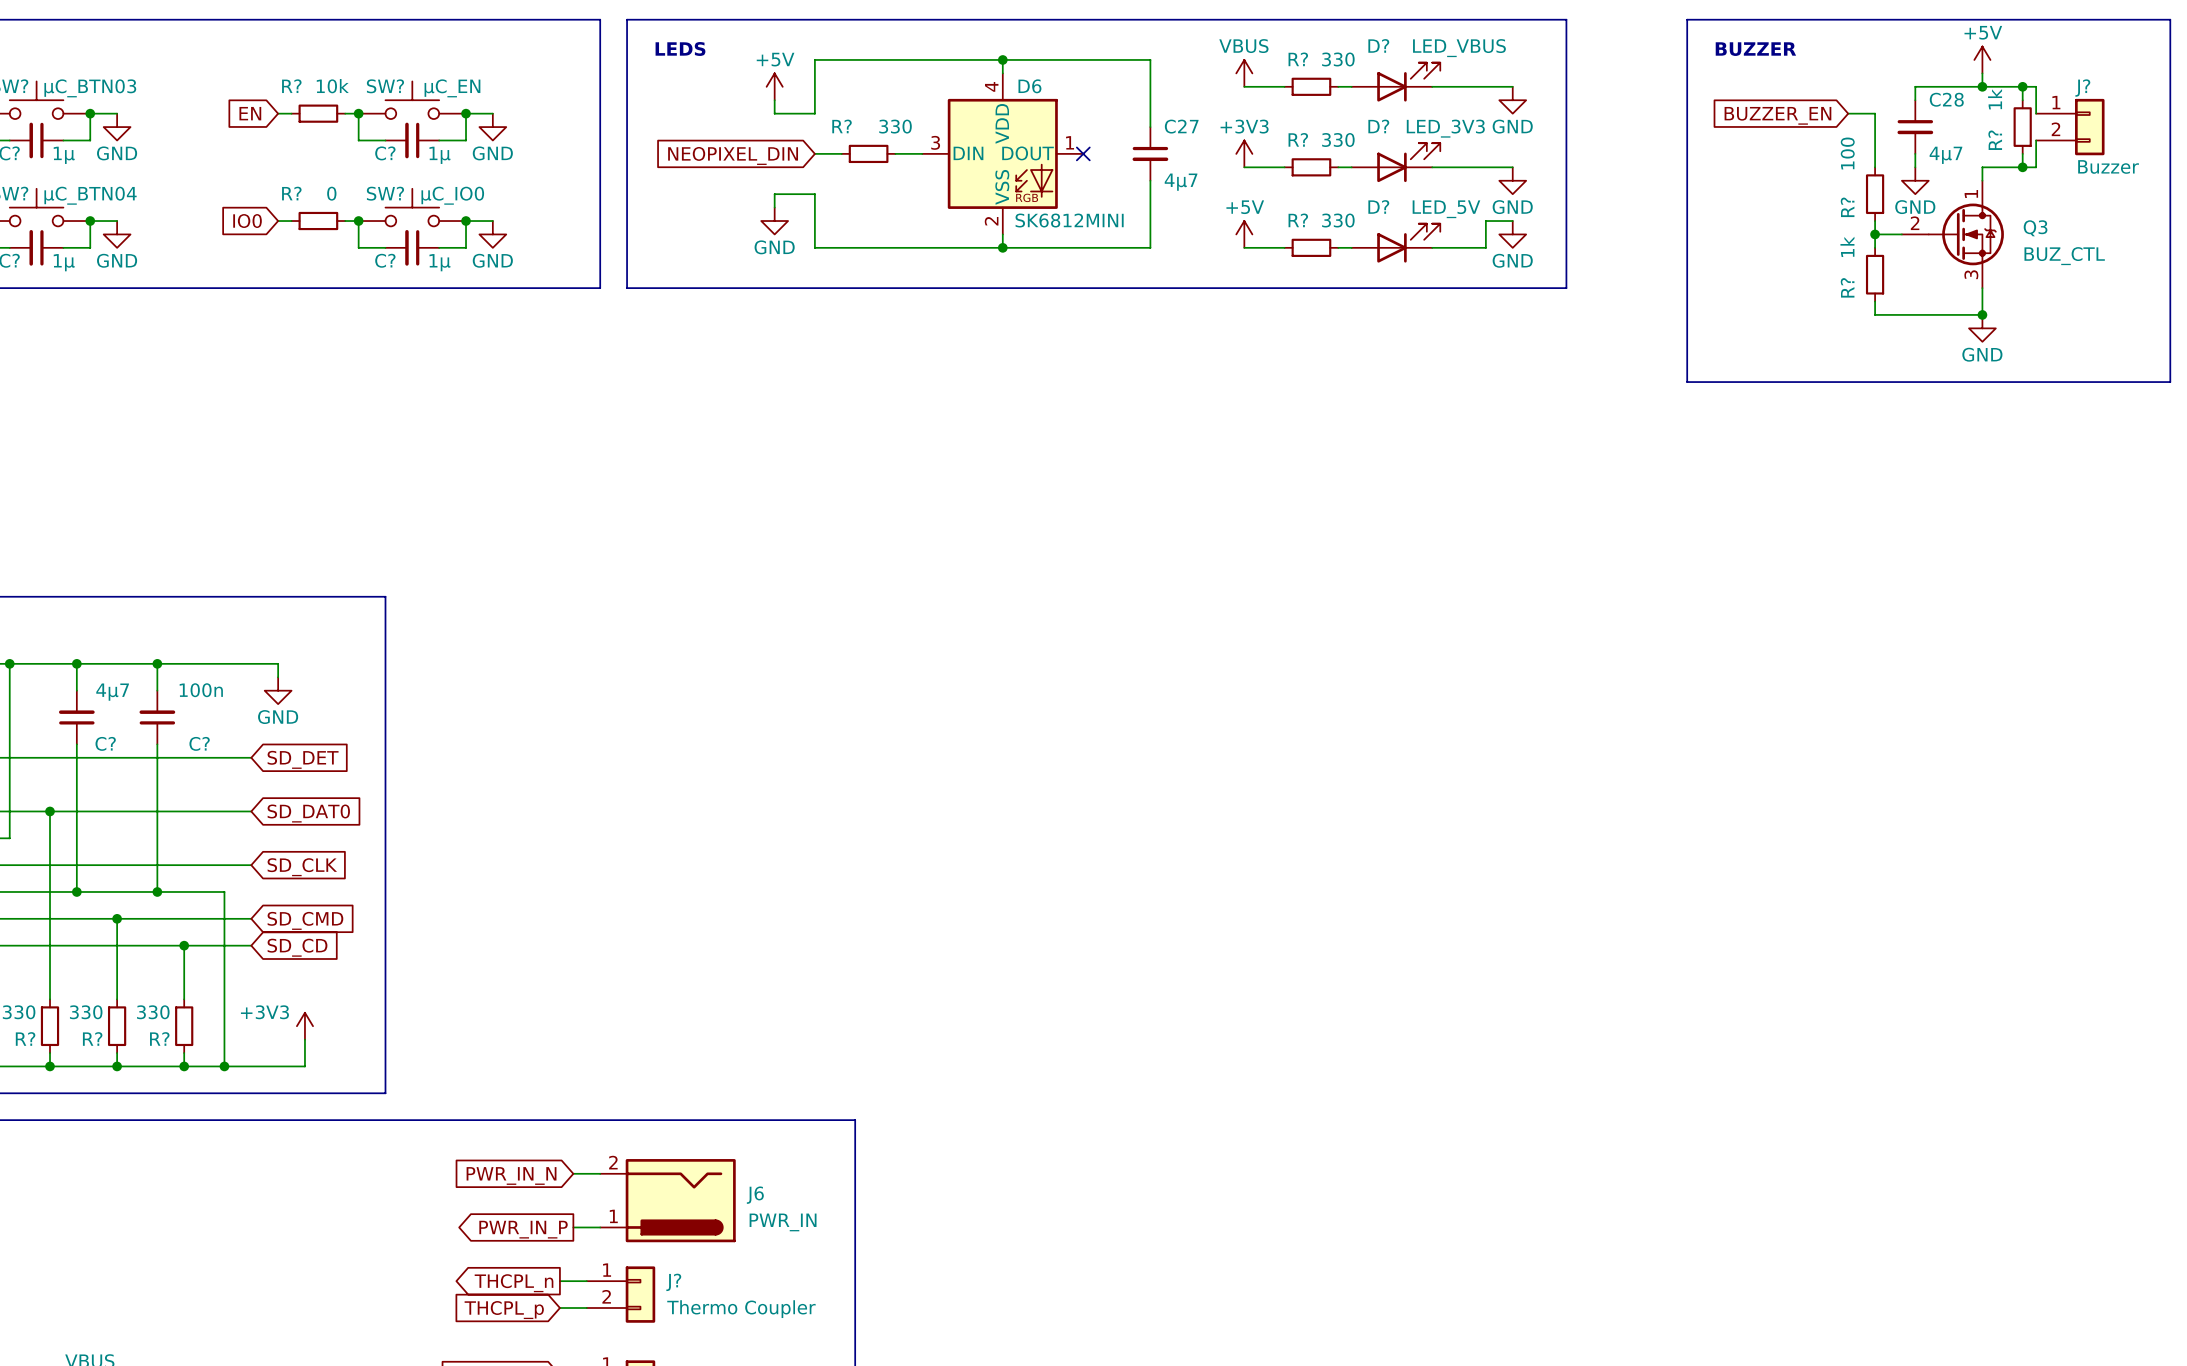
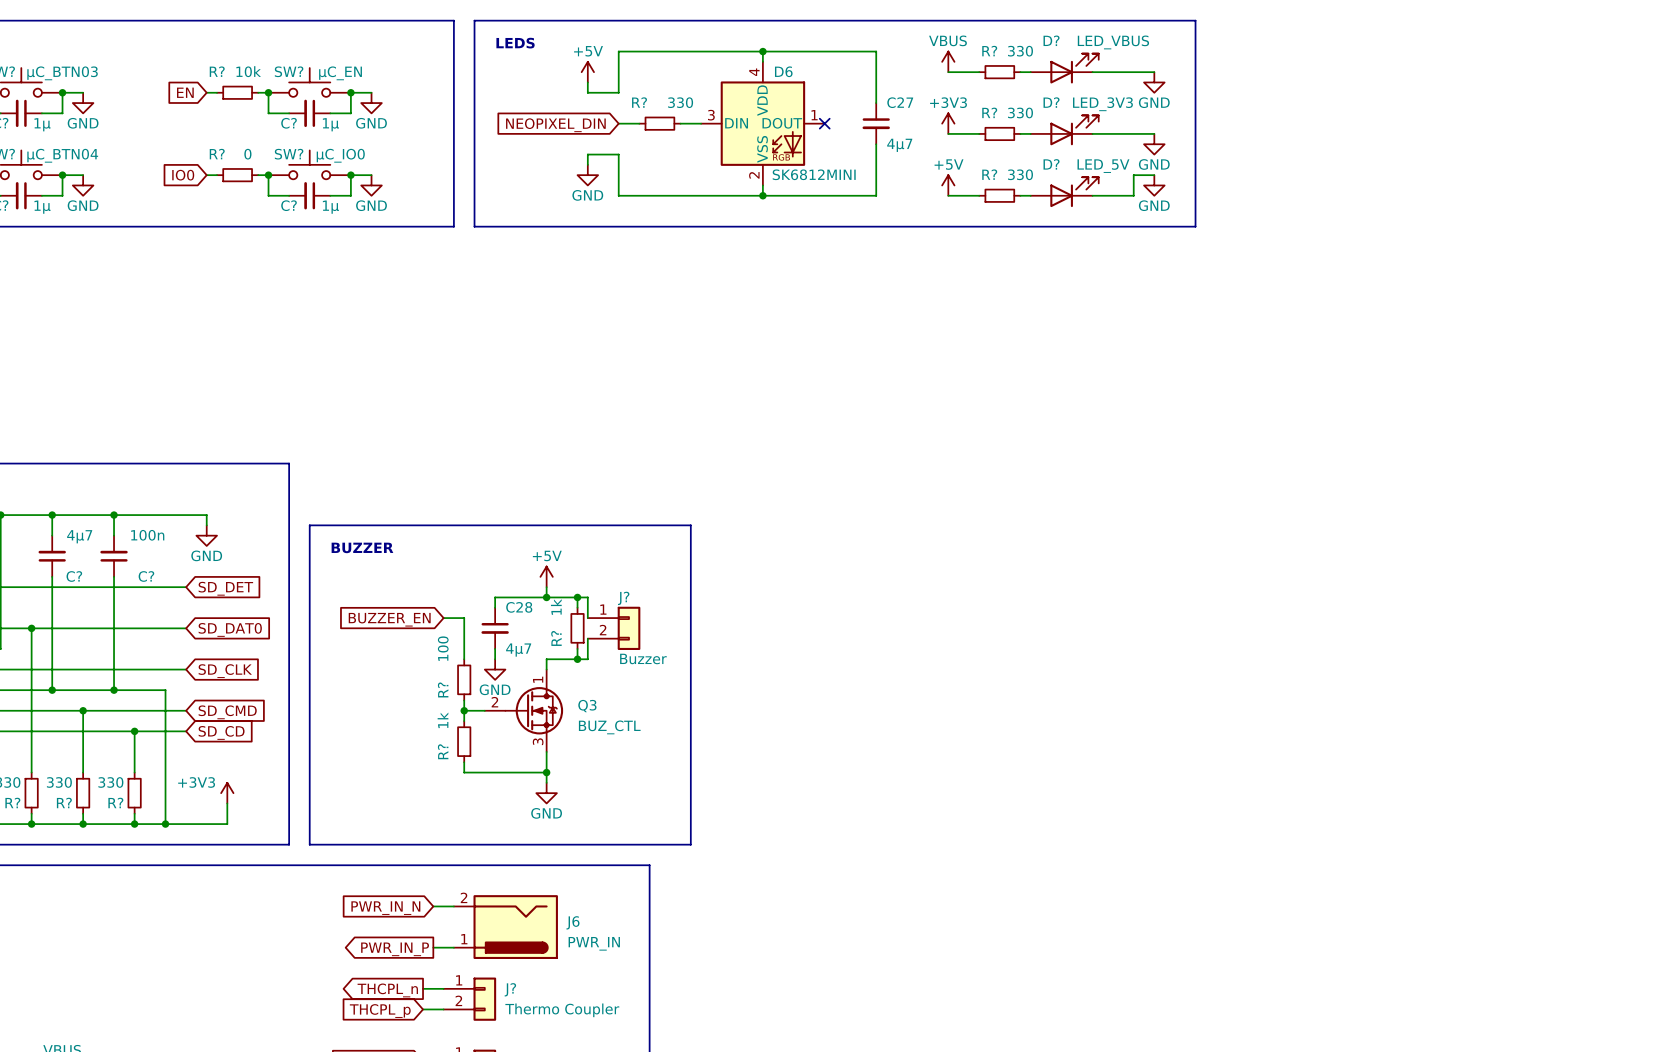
line: (1687, 19) (1687, 382) (2170, 382) (2170, 19) (1687, 19) -> none
text: BUZZER (1755, 49) -> none
power symbol: +5V (1982, 59) -> none
wire: (1982, 73) (1982, 86) -> none
junction: (1982, 86) -> none
wire: (2022, 86) (2022, 100) -> none
junction: (2022, 86) -> none
wire: (1915, 100) (1915, 86) (2036, 86) (2036, 113) -> none
wire: (1848, 113) (1875, 113) (1875, 167) -> none
global label: BUZZER_EN (1777, 115) -> none
C28 position: (1915, 127) -> (495, 628)
R?: 1k (2022, 127) -> none
J?: Buzzer (2070, 127) -> none
wire: (2036, 140) (2036, 167) (1982, 167) (1982, 180) -> none
wire: (1915, 153) (1915, 167) -> none
wire: (2022, 153) (2022, 167) -> none
junction: (2022, 167) -> none
power symbol: GND (1915, 180) -> none
R?: 100 (1875, 194) -> none
wire: (1875, 221) (1875, 247) -> none
wire: (1875, 234) (1901, 234) -> none
junction: (1875, 234) -> none
Q3 position: (1952, 234) -> (523, 710)
R?: 1k (1875, 274) -> none
wire: (1982, 288) (1982, 314) (1875, 314) (1875, 301) -> none
junction: (1982, 314) -> none
power symbol: GND (1982, 328) -> none
line: none -> (309, 525) (309, 844) (690, 844) (690, 525) (309, 525)
text: none -> BUZZER (362, 547)
power symbol: none -> +5V (546, 576)
wire: none -> (546, 587) (546, 597)
junction: none -> (546, 597)
wire: none -> (577, 597) (577, 607)
junction: none -> (577, 597)
wire: none -> (495, 607) (495, 597) (587, 597) (587, 618)
wire: none -> (443, 618) (464, 618) (464, 659)
global label: none -> BUZZER_EN (389, 619)
R?: none -> 1k (577, 628)
J?: none -> Buzzer (614, 628)
wire: none -> (587, 638) (587, 659) (546, 659) (546, 669)
wire: none -> (495, 648) (495, 659)
wire: none -> (577, 648) (577, 659)
junction: none -> (577, 659)
power symbol: none -> GND (495, 669)
R?: none -> 100 (464, 679)
wire: none -> (464, 700) (464, 721)
wire: none -> (464, 710) (484, 710)
junction: none -> (464, 710)
R?: none -> 1k (464, 741)
wire: none -> (546, 751) (546, 782)
wire: none -> (464, 762) (464, 772) (546, 772)
junction: none -> (546, 772)
power symbol: none -> GND (546, 793)

